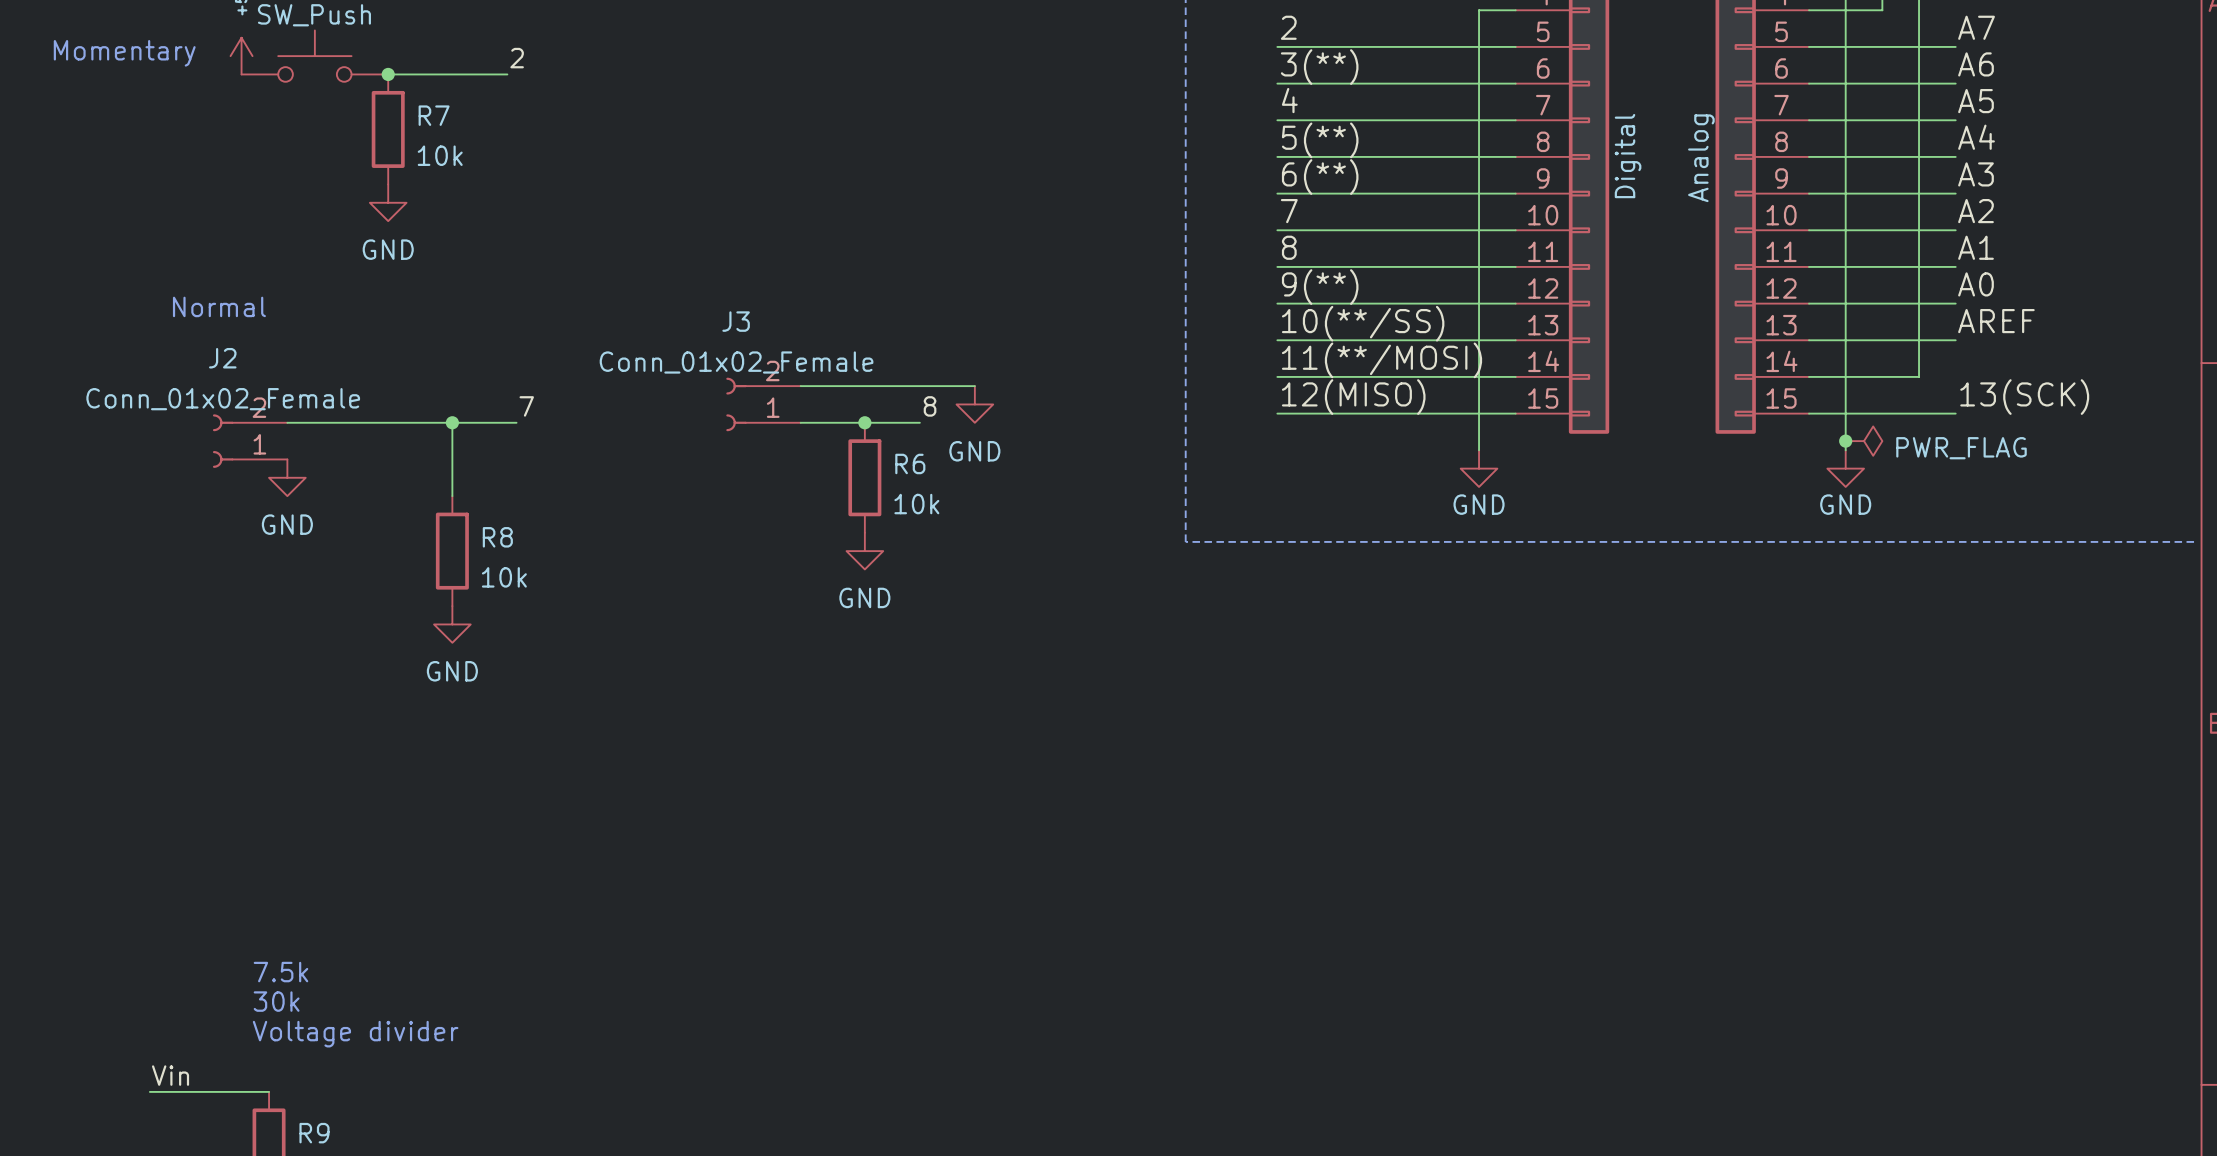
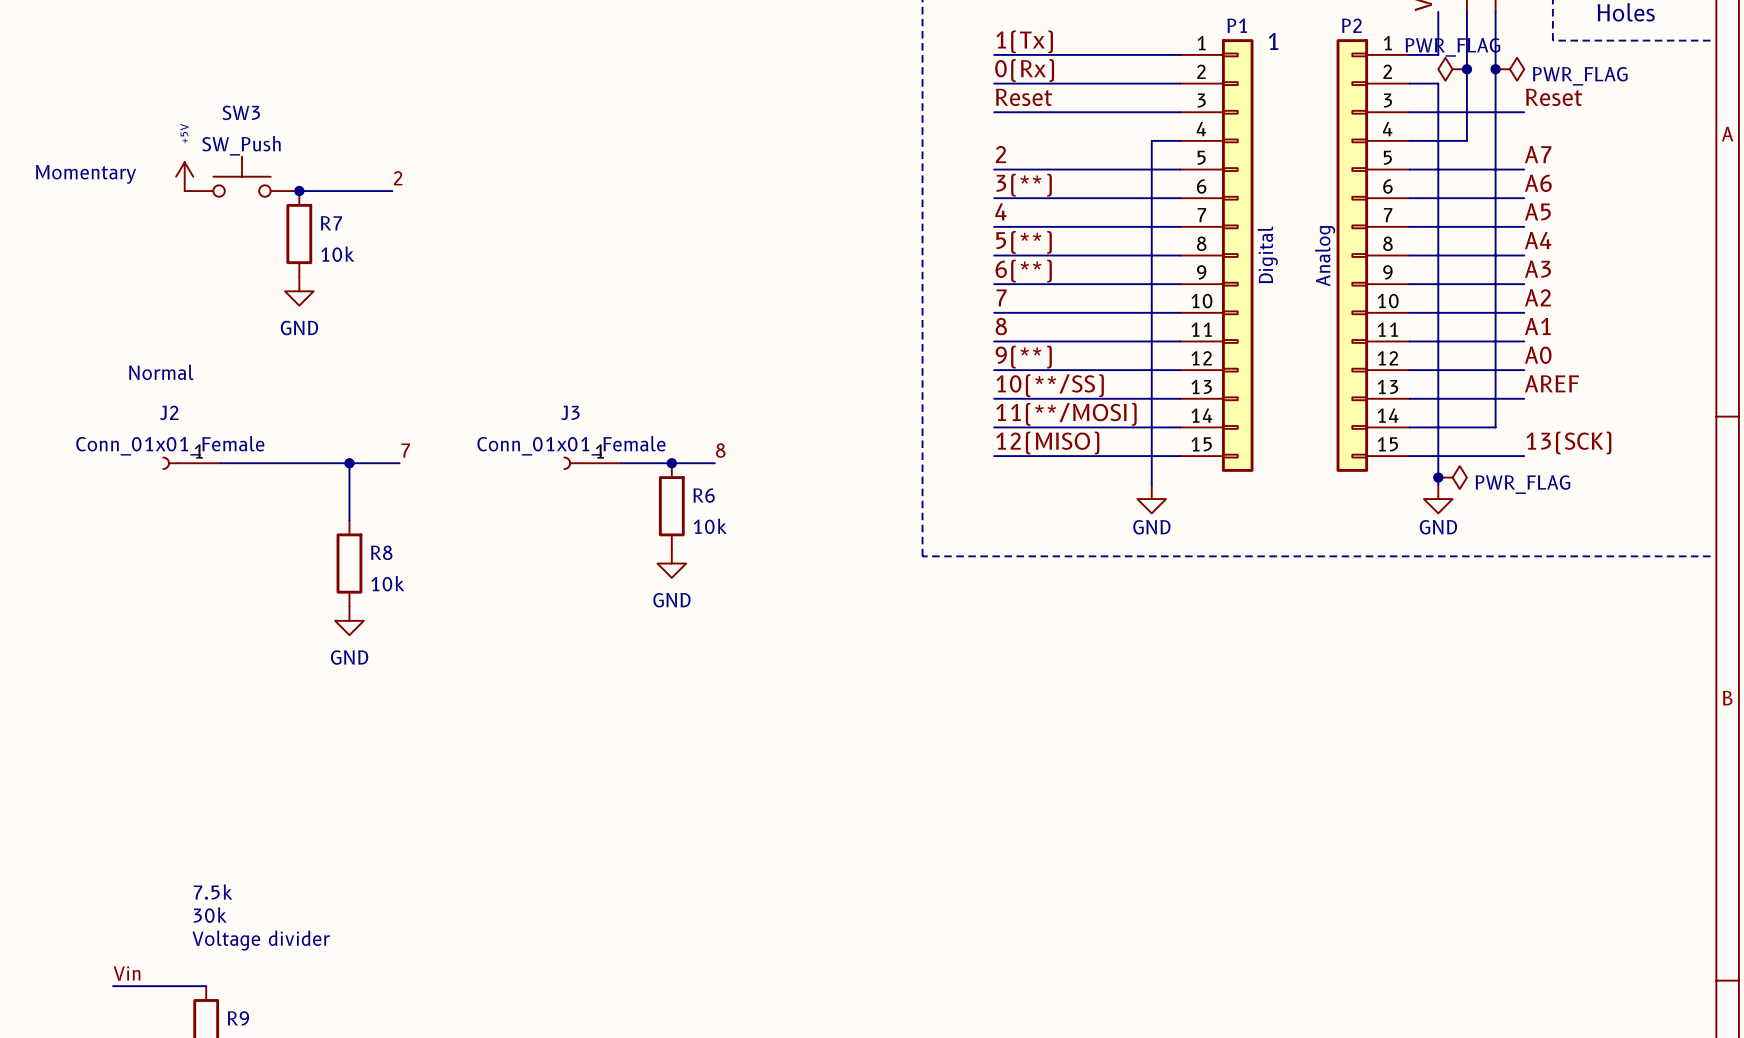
J3 value: Conn_01x02_Female (736, 362) -> Conn_01x01_Female (571, 445)
J3 symbol: [726, 377, 801, 432] -> [563, 456, 622, 470]
wire: (800, 386) (974, 386) -> none
J2 value: Conn_01x02_Female (223, 399) -> Conn_01x01_Female (170, 445)
power symbol: GND (974, 404) -> none
J2 symbol: [212, 414, 288, 468] -> [162, 456, 221, 470]
power symbol: GND (287, 477) -> none

